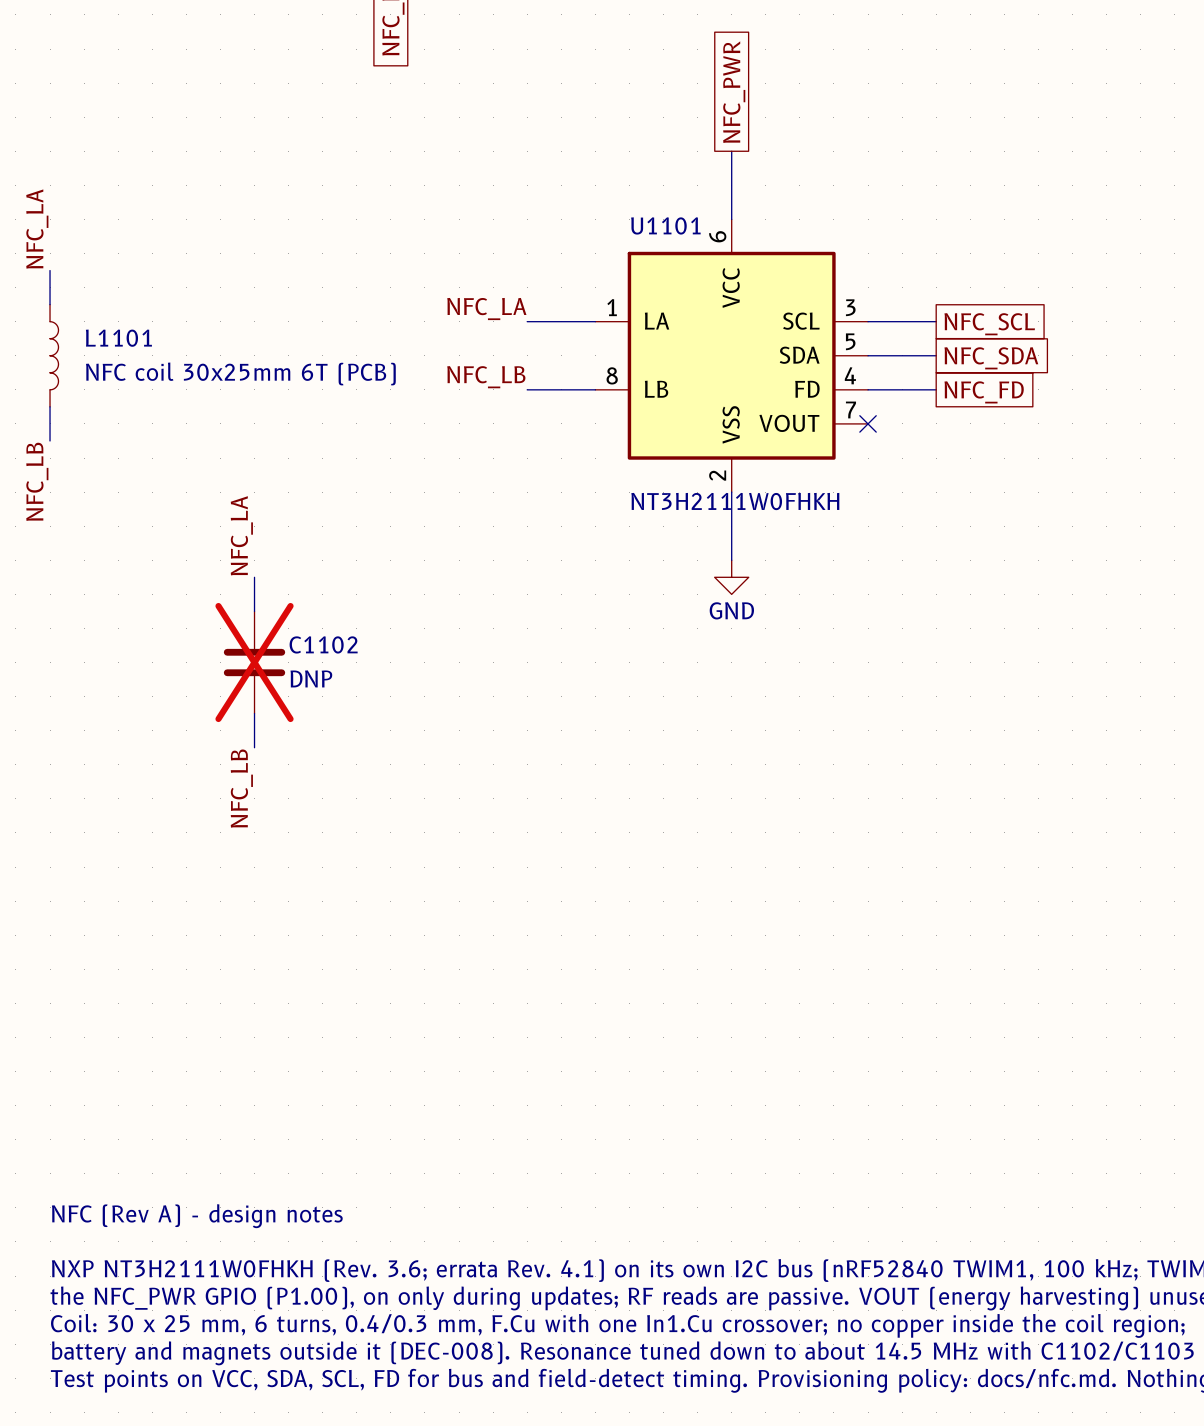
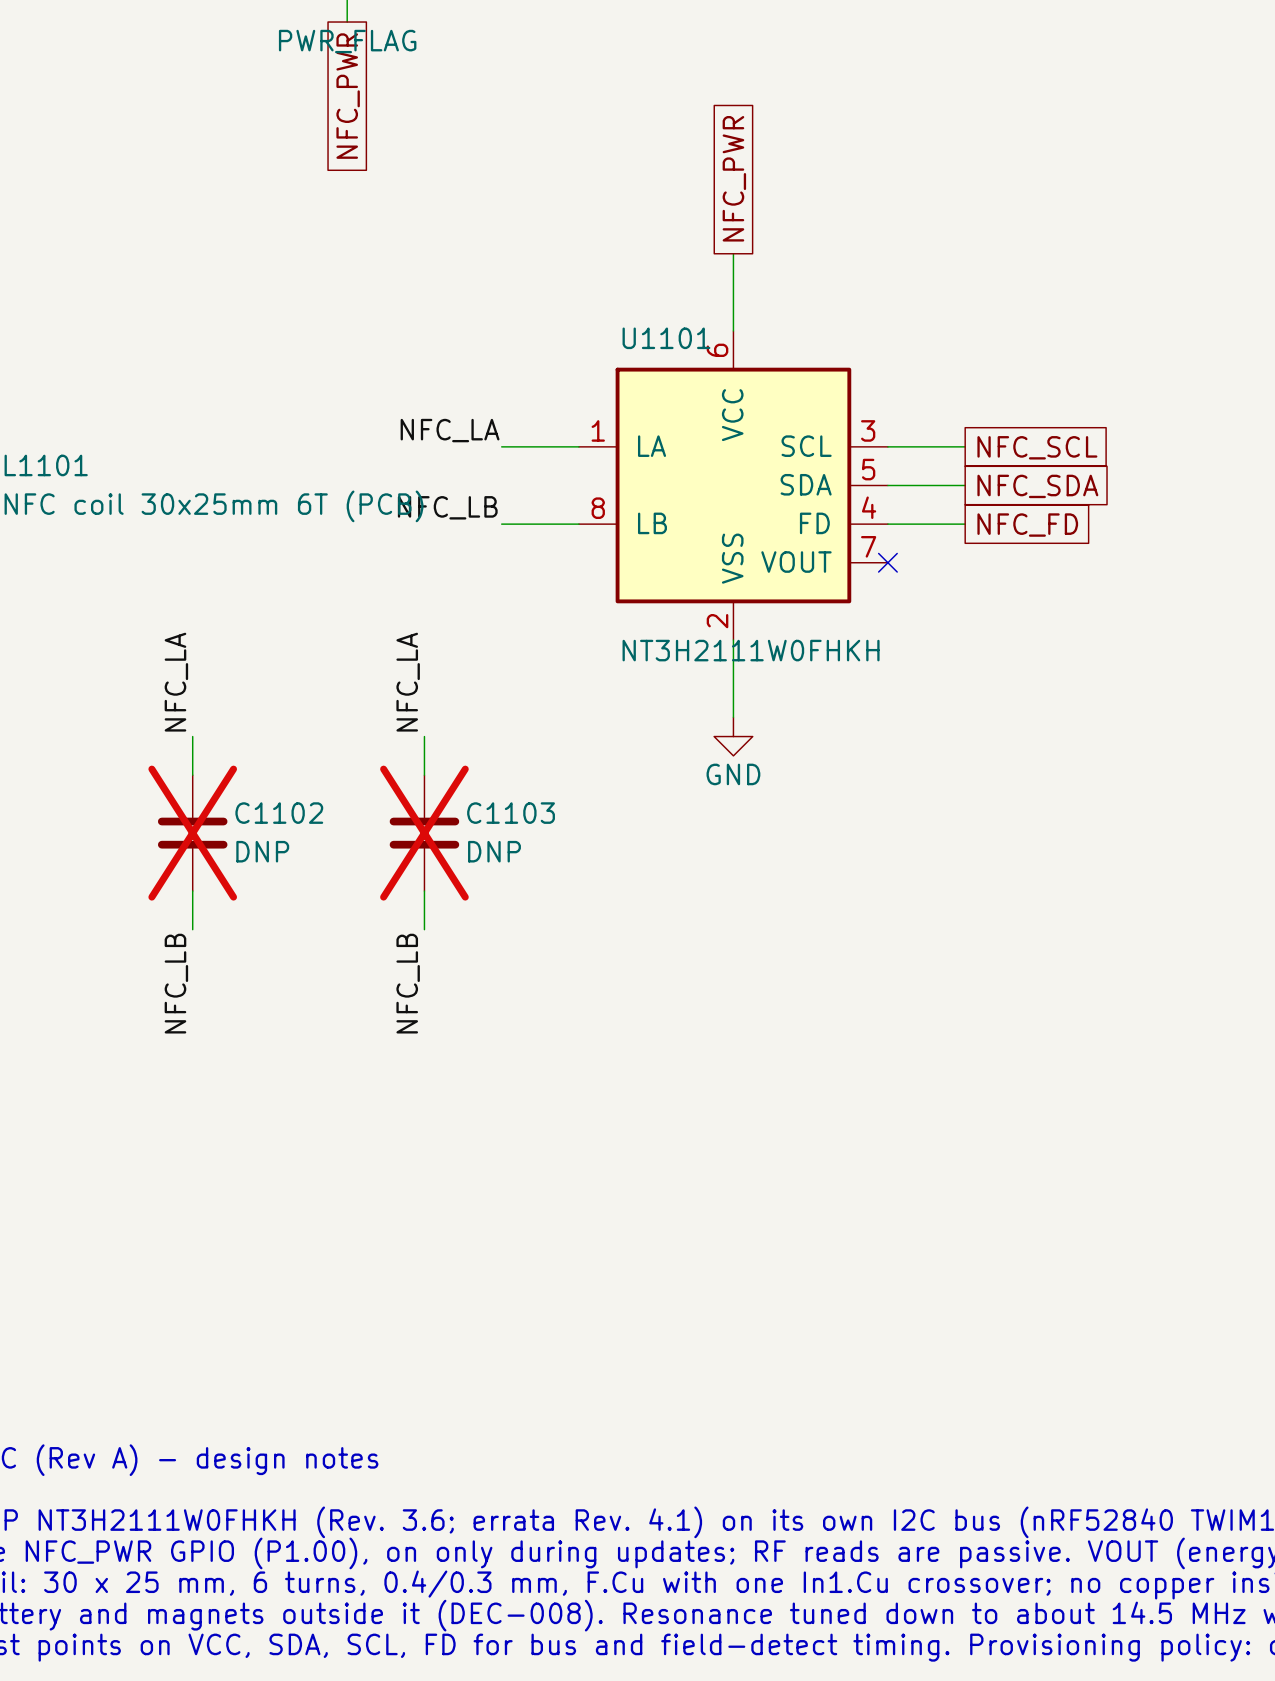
label: none -> NFC_LA (408, 682)
wire: none -> (424, 736) (424, 775)
C1103: none -> DNP (424, 833)
wire: none -> (424, 891) (424, 929)
label: none -> NFC_LB (408, 983)

